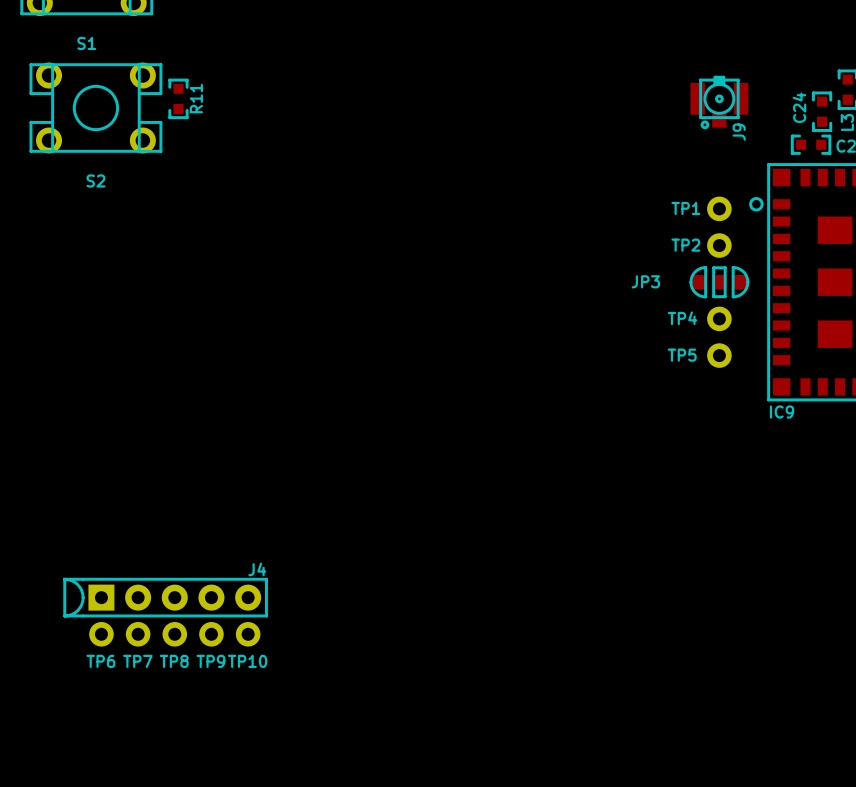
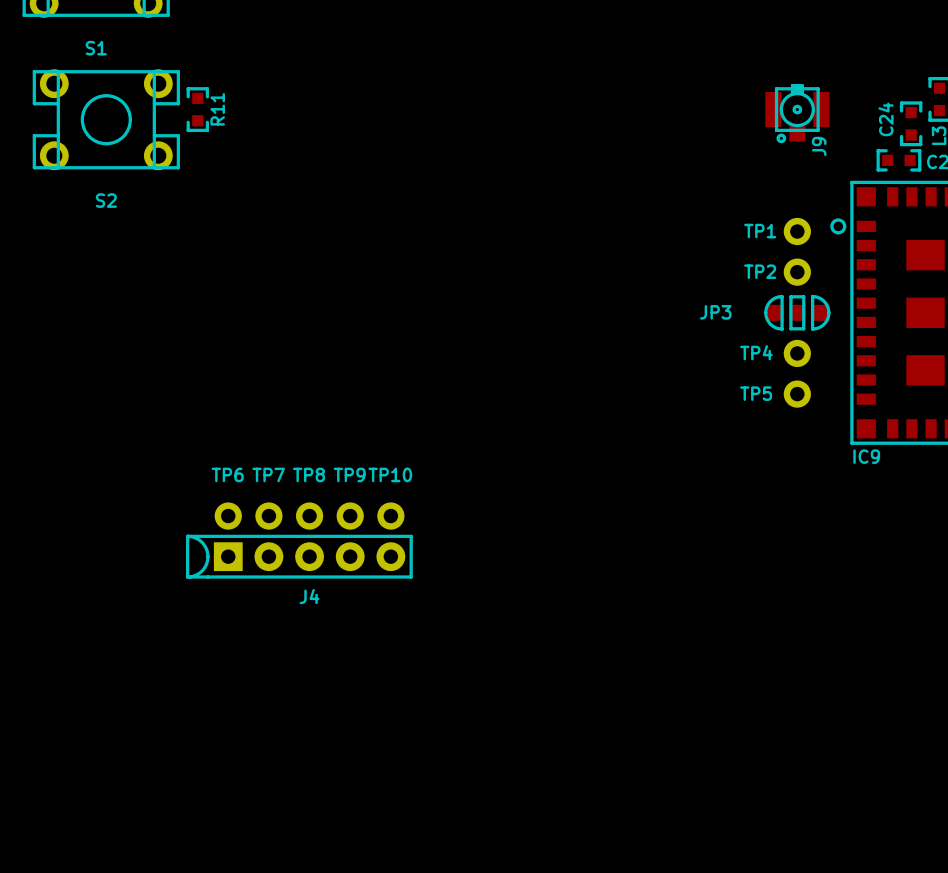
J4 name position: J4 (257, 569) -> J4 (309, 596)
J4 position: (165, 597) -> (299, 556)
TP6 position: (101, 634) -> (228, 516)
TP7 position: (138, 634) -> (268, 516)
TP8 position: (174, 634) -> (309, 516)
TP9 position: (211, 634) -> (350, 516)
TP10 position: (248, 634) -> (390, 516)
TP6 name position: TP6 (100, 661) -> TP6 (227, 474)
TP7 name position: TP7 (137, 661) -> TP7 (268, 474)
TP8 name position: TP8 (174, 661) -> TP8 (308, 474)
TP9 name position: TP9 (210, 661) -> TP9 (349, 474)
TP10 name position: TP10 (247, 661) -> TP10 (390, 474)

